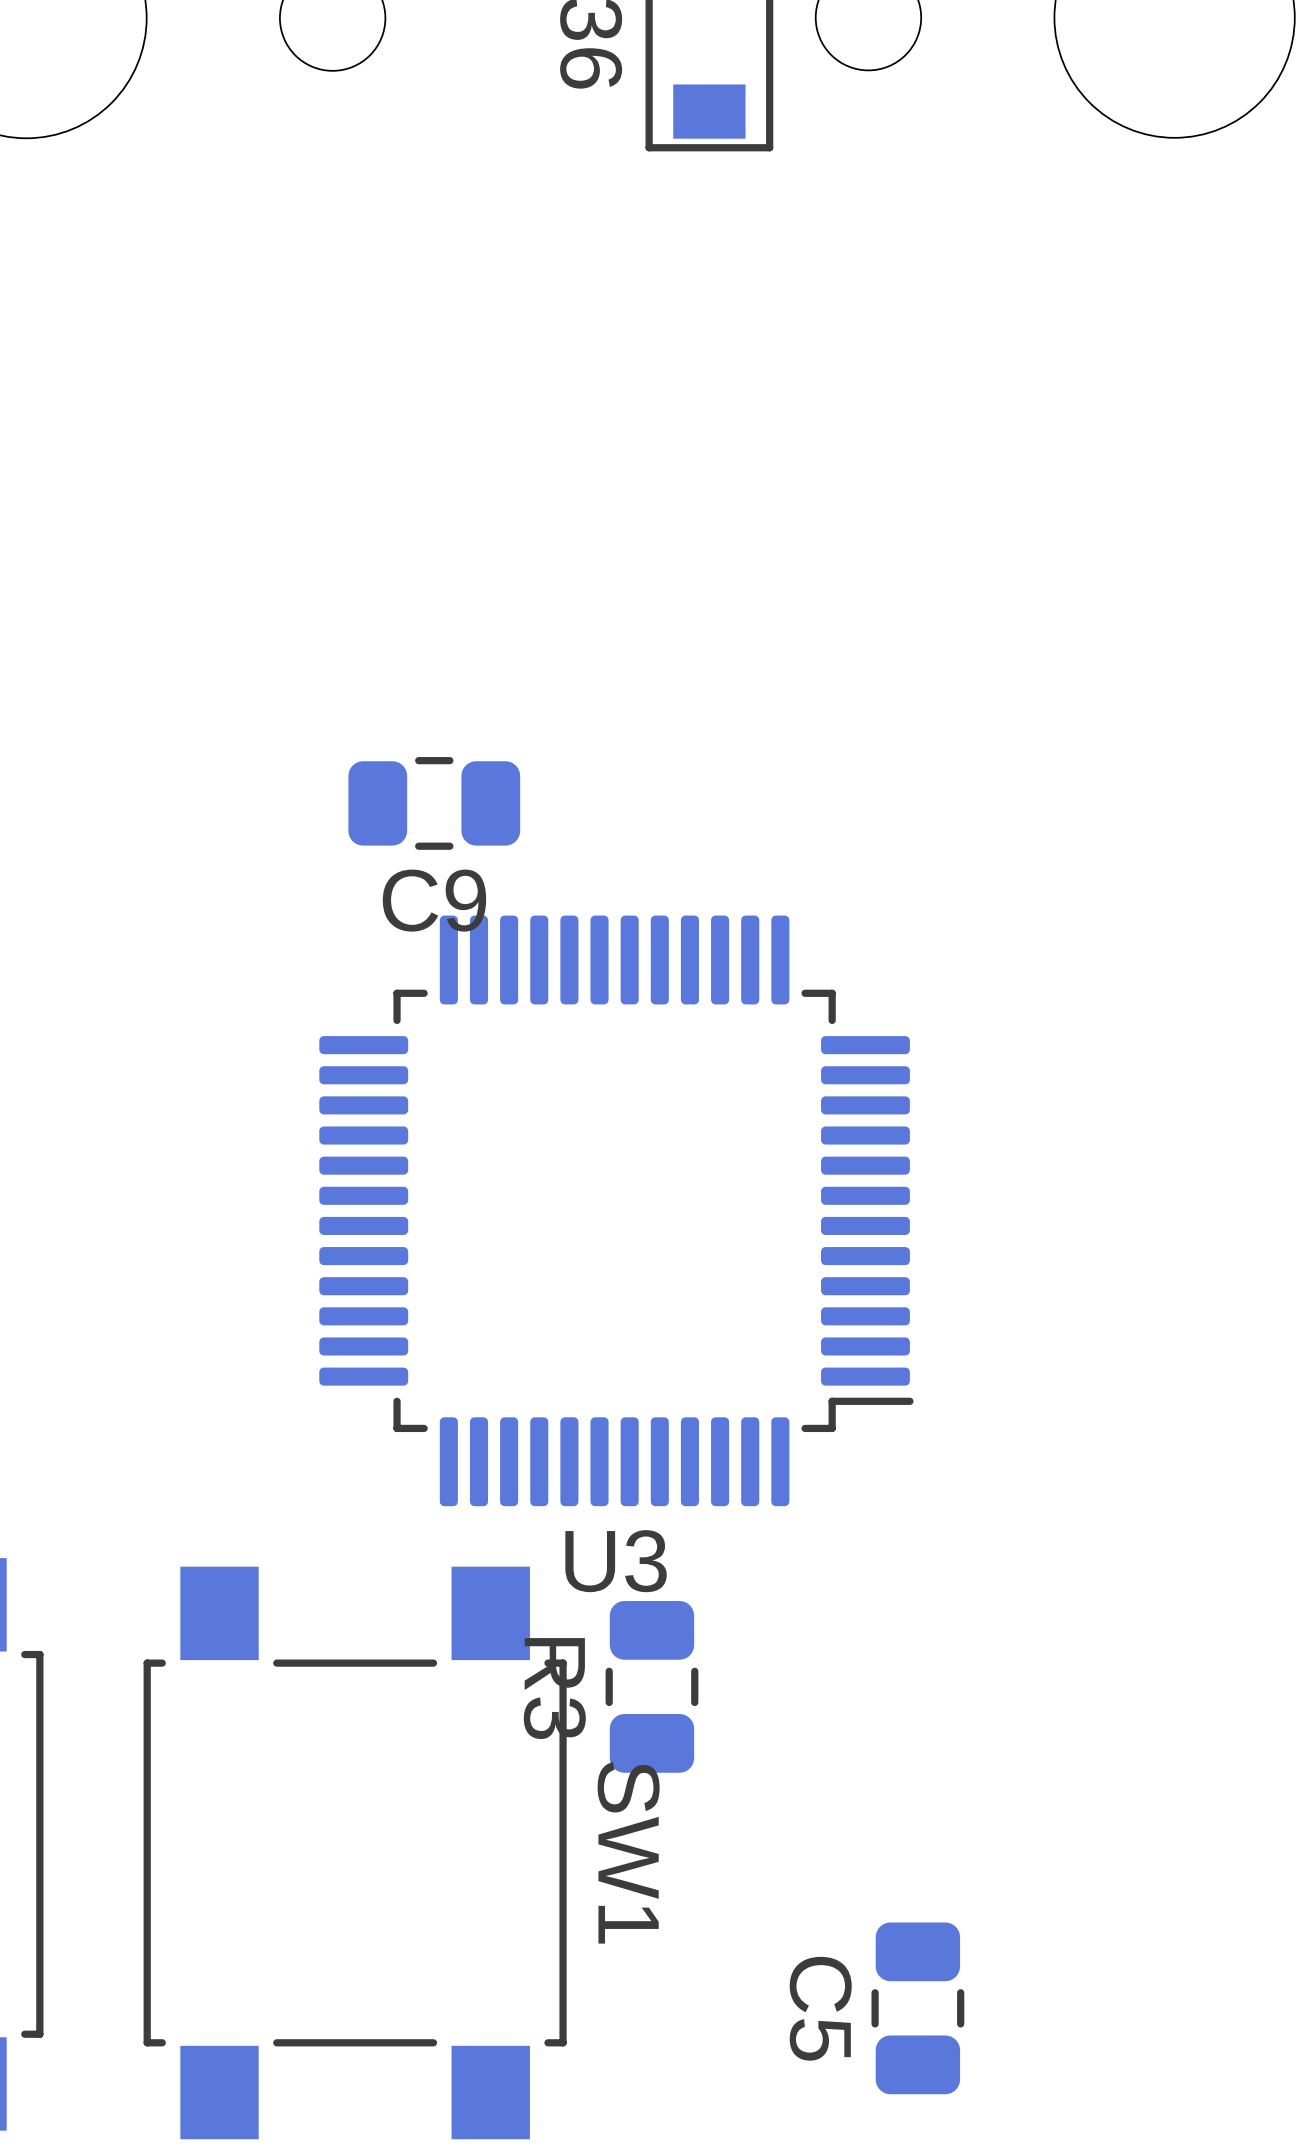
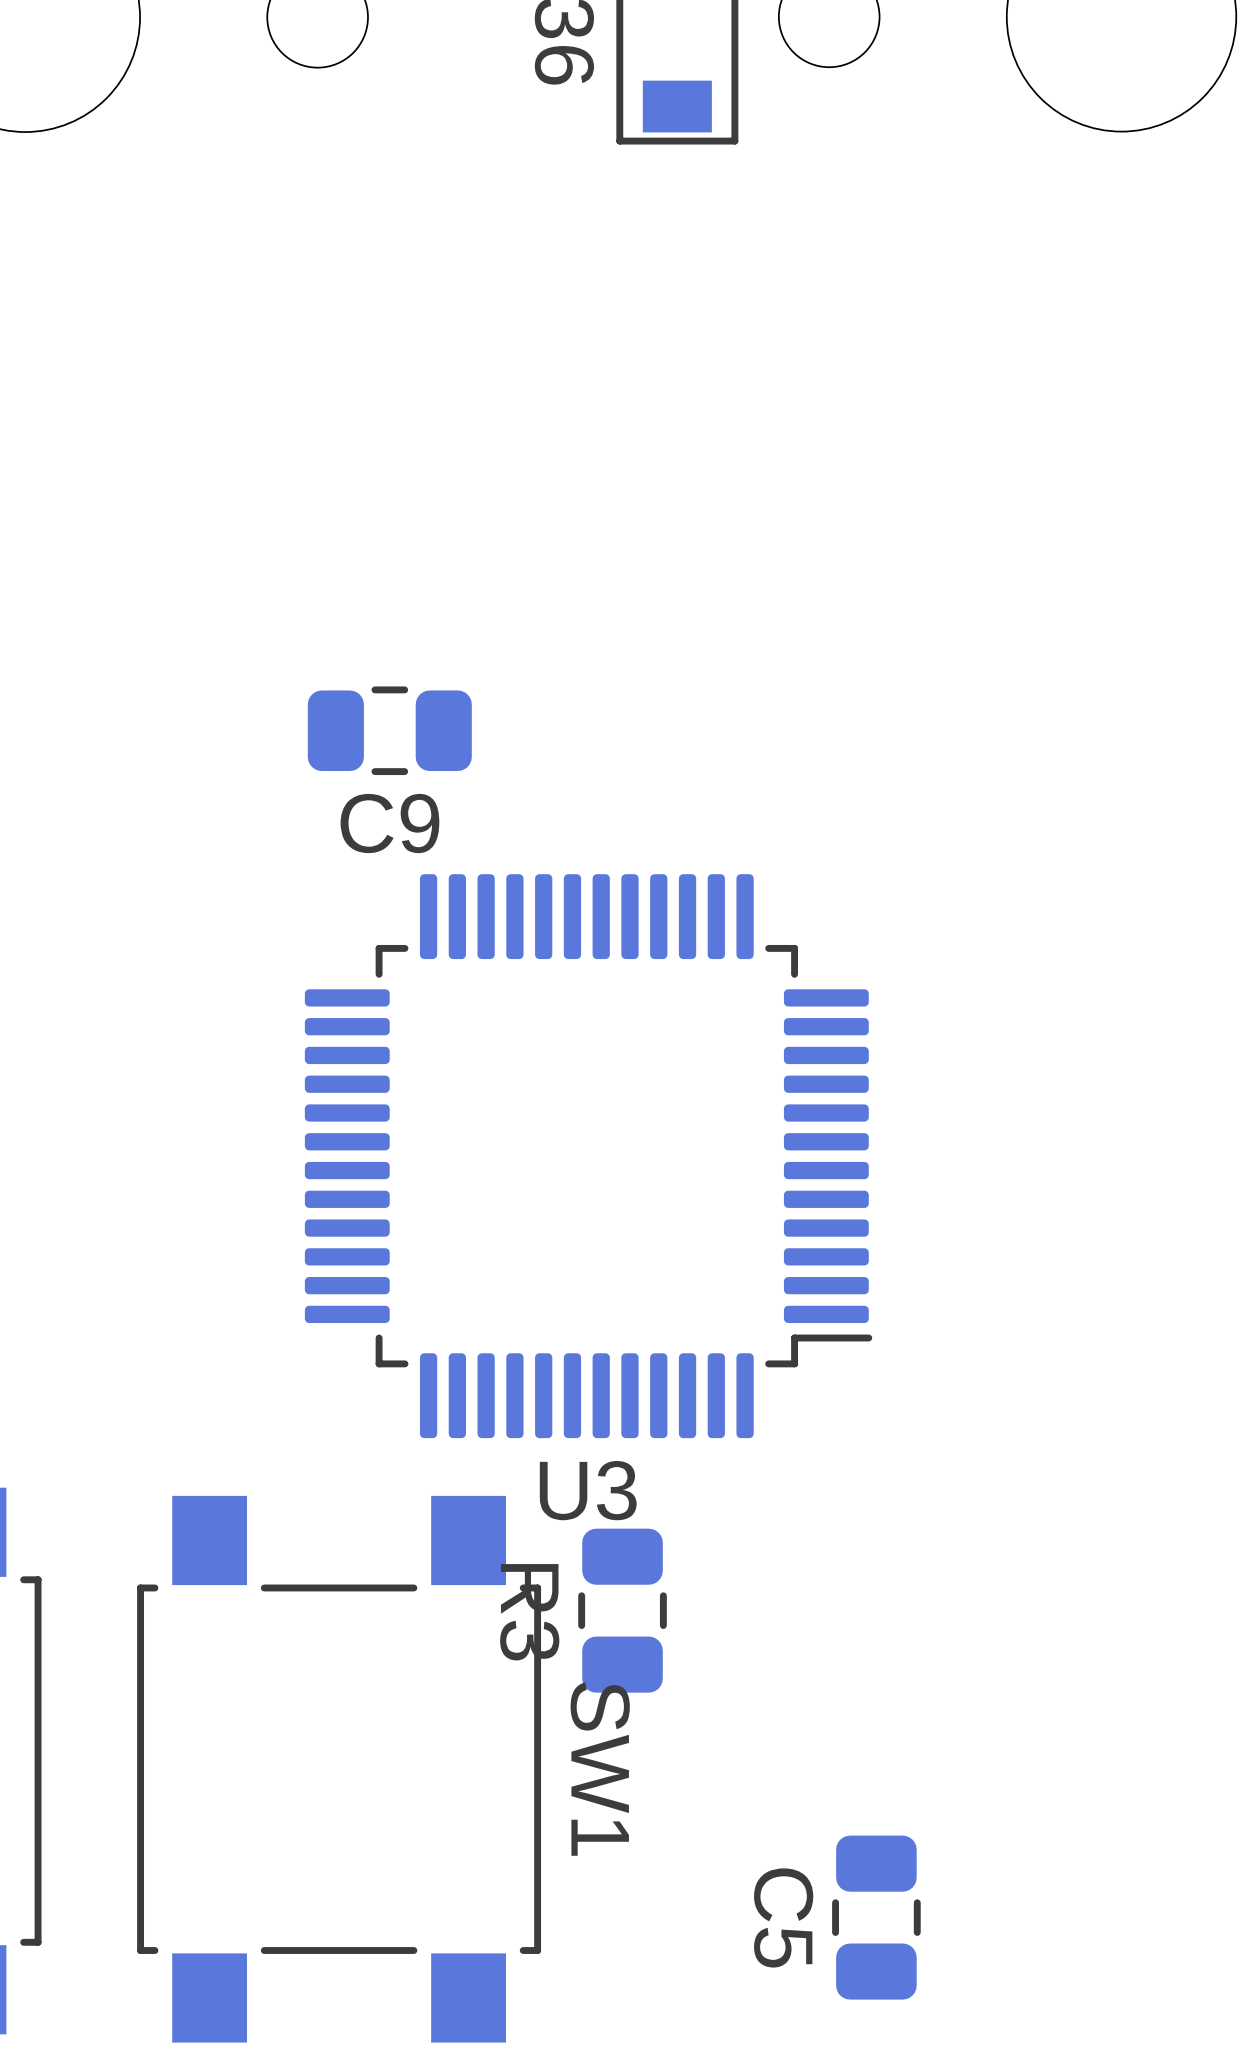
C9 position: (434, 803) -> (389, 730)

